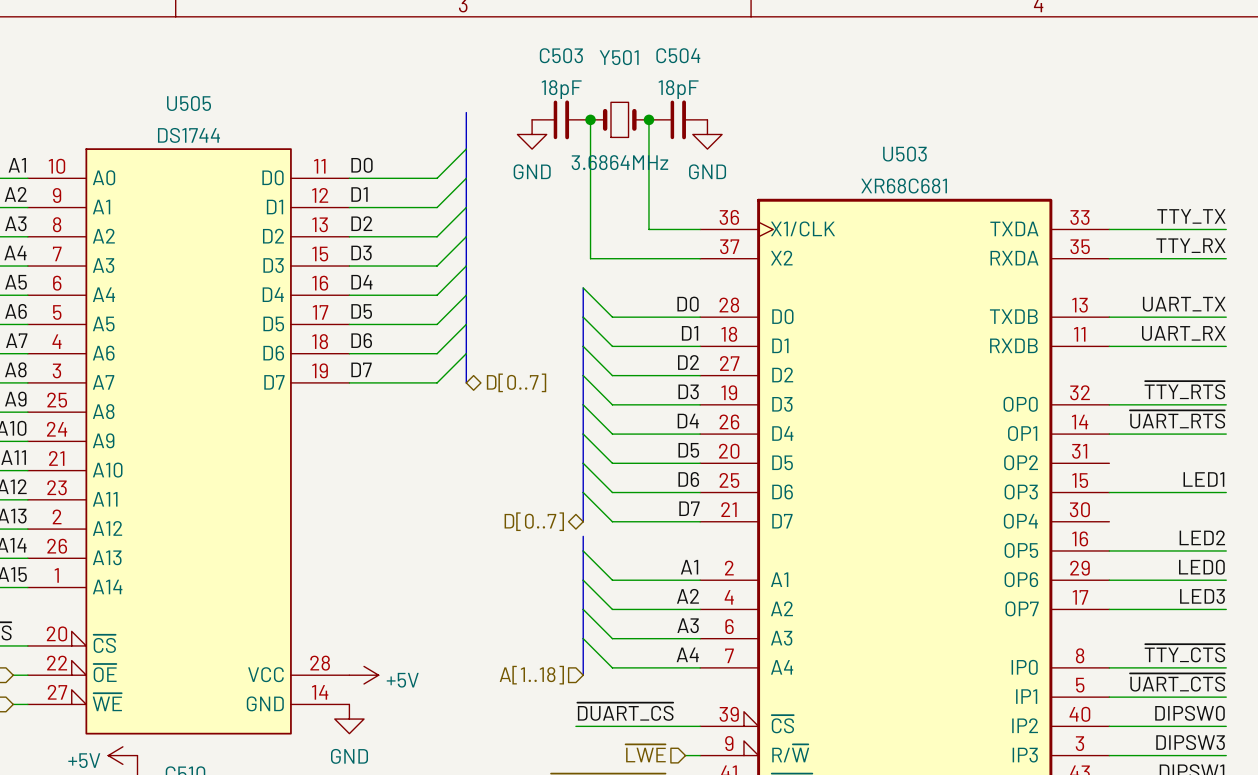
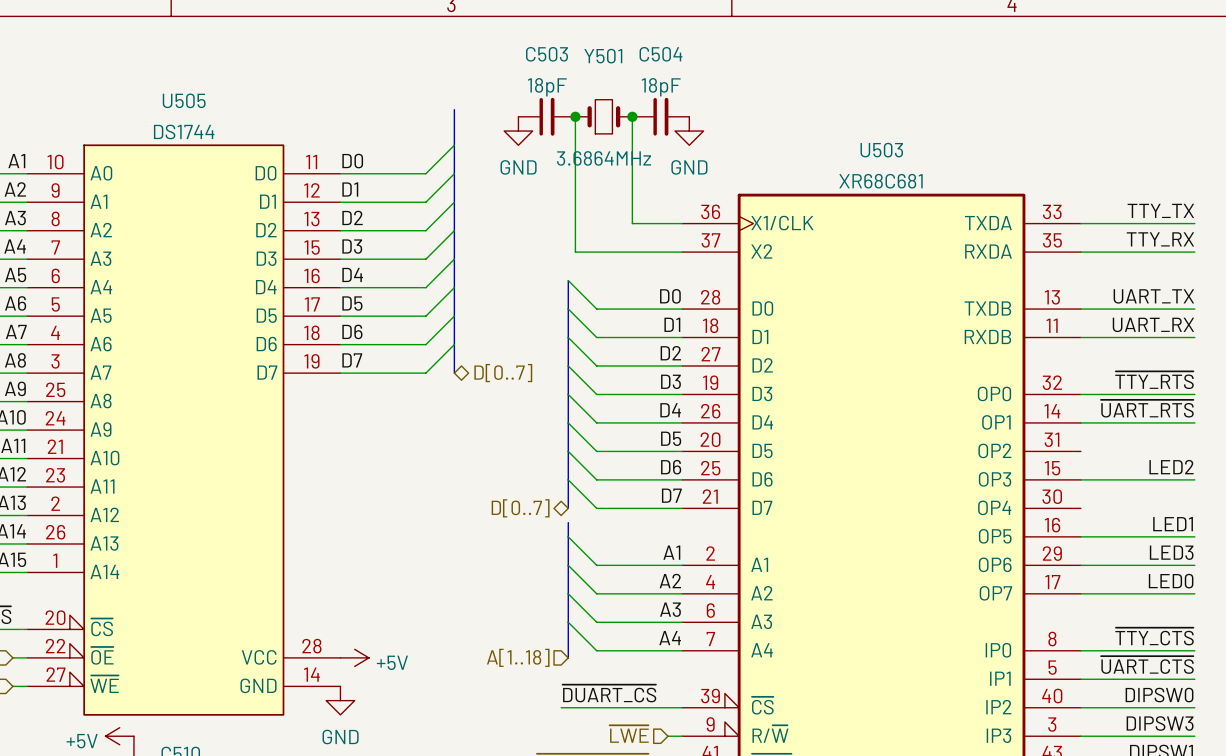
label: LED1 (1203, 479) -> LED2 (1171, 467)
label: LED2 (1202, 537) -> LED1 (1173, 524)
label: LED0 (1201, 567) -> LED3 (1171, 552)
label: LED3 (1202, 596) -> LED0 (1171, 581)

